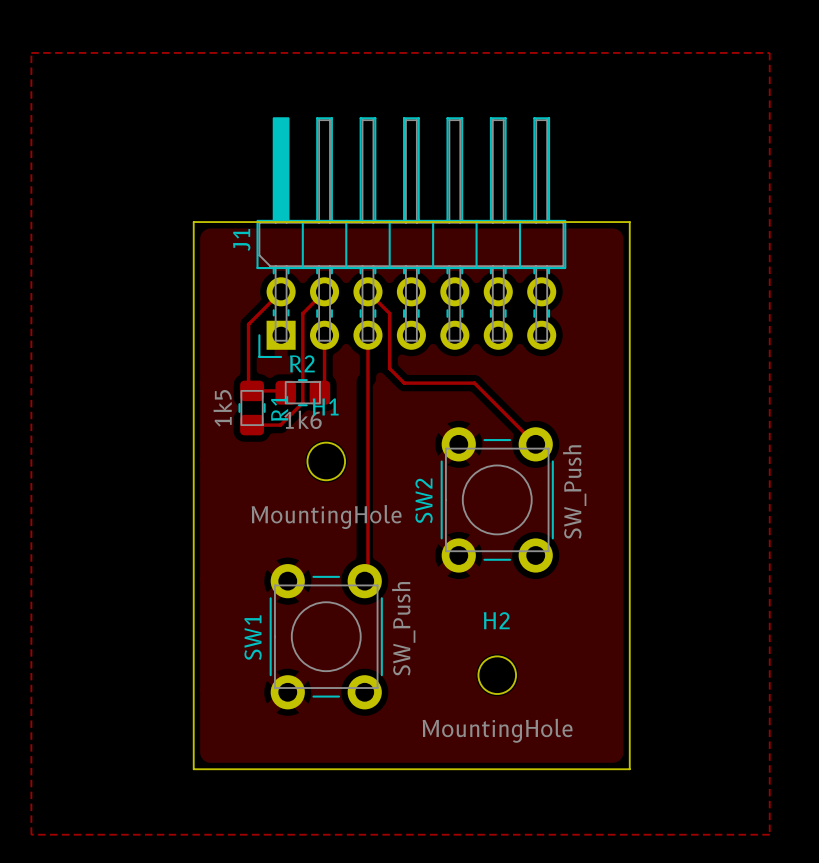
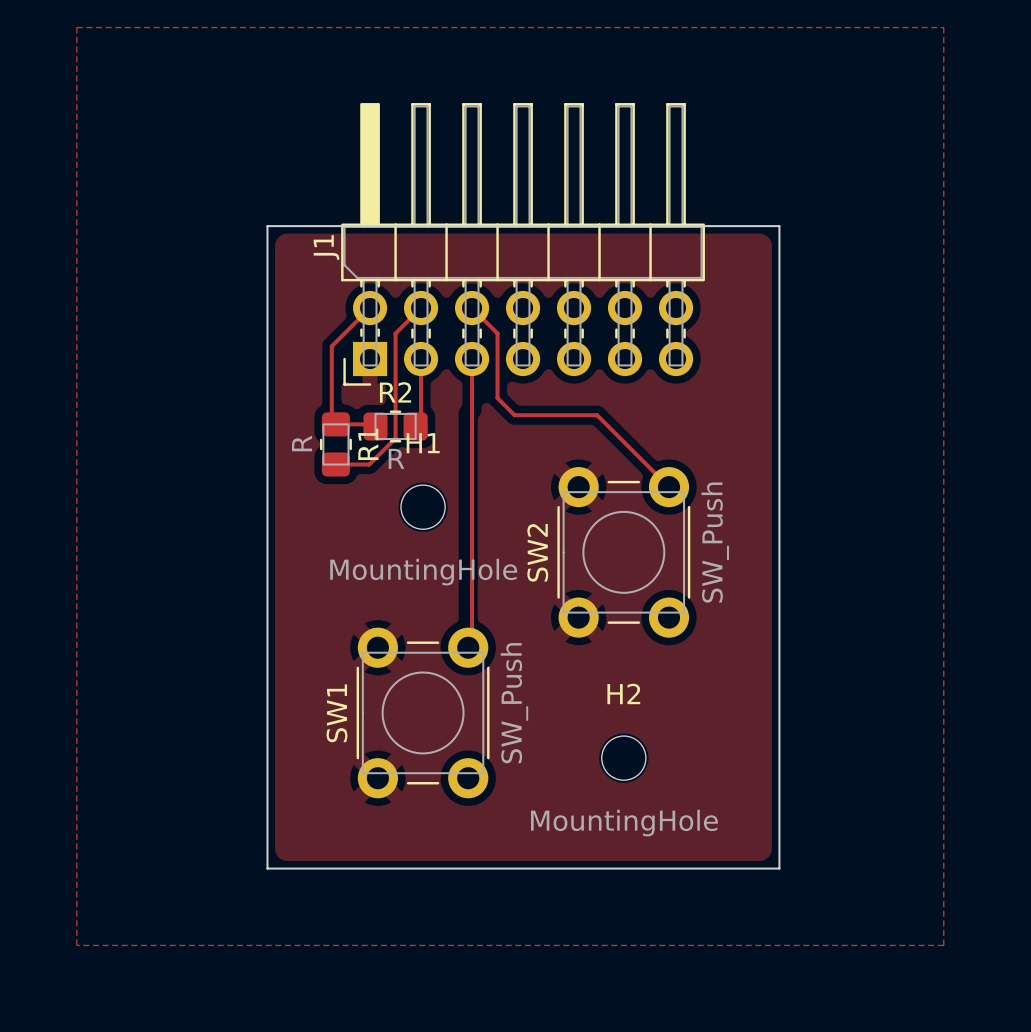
R1 value: 1k5 (222, 408) -> R (302, 443)
R2 value: 1k6 (302, 419) -> R (396, 458)

